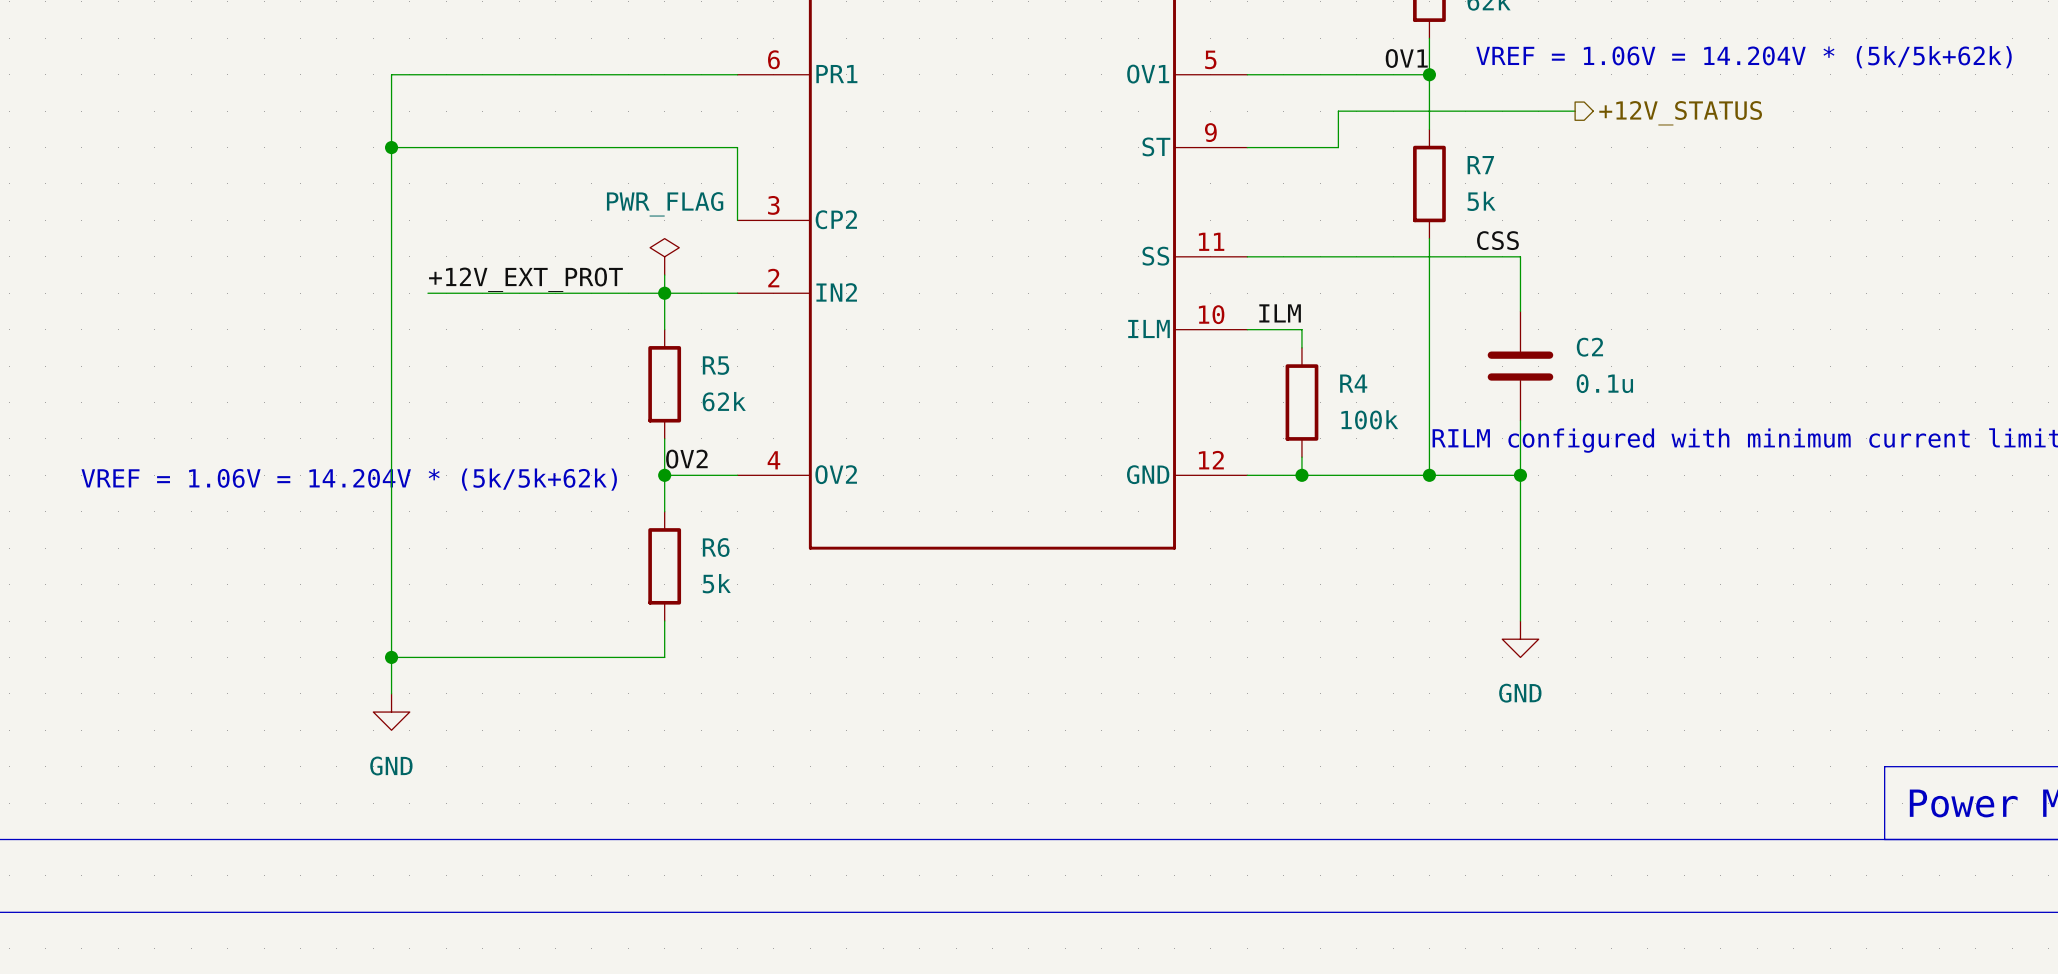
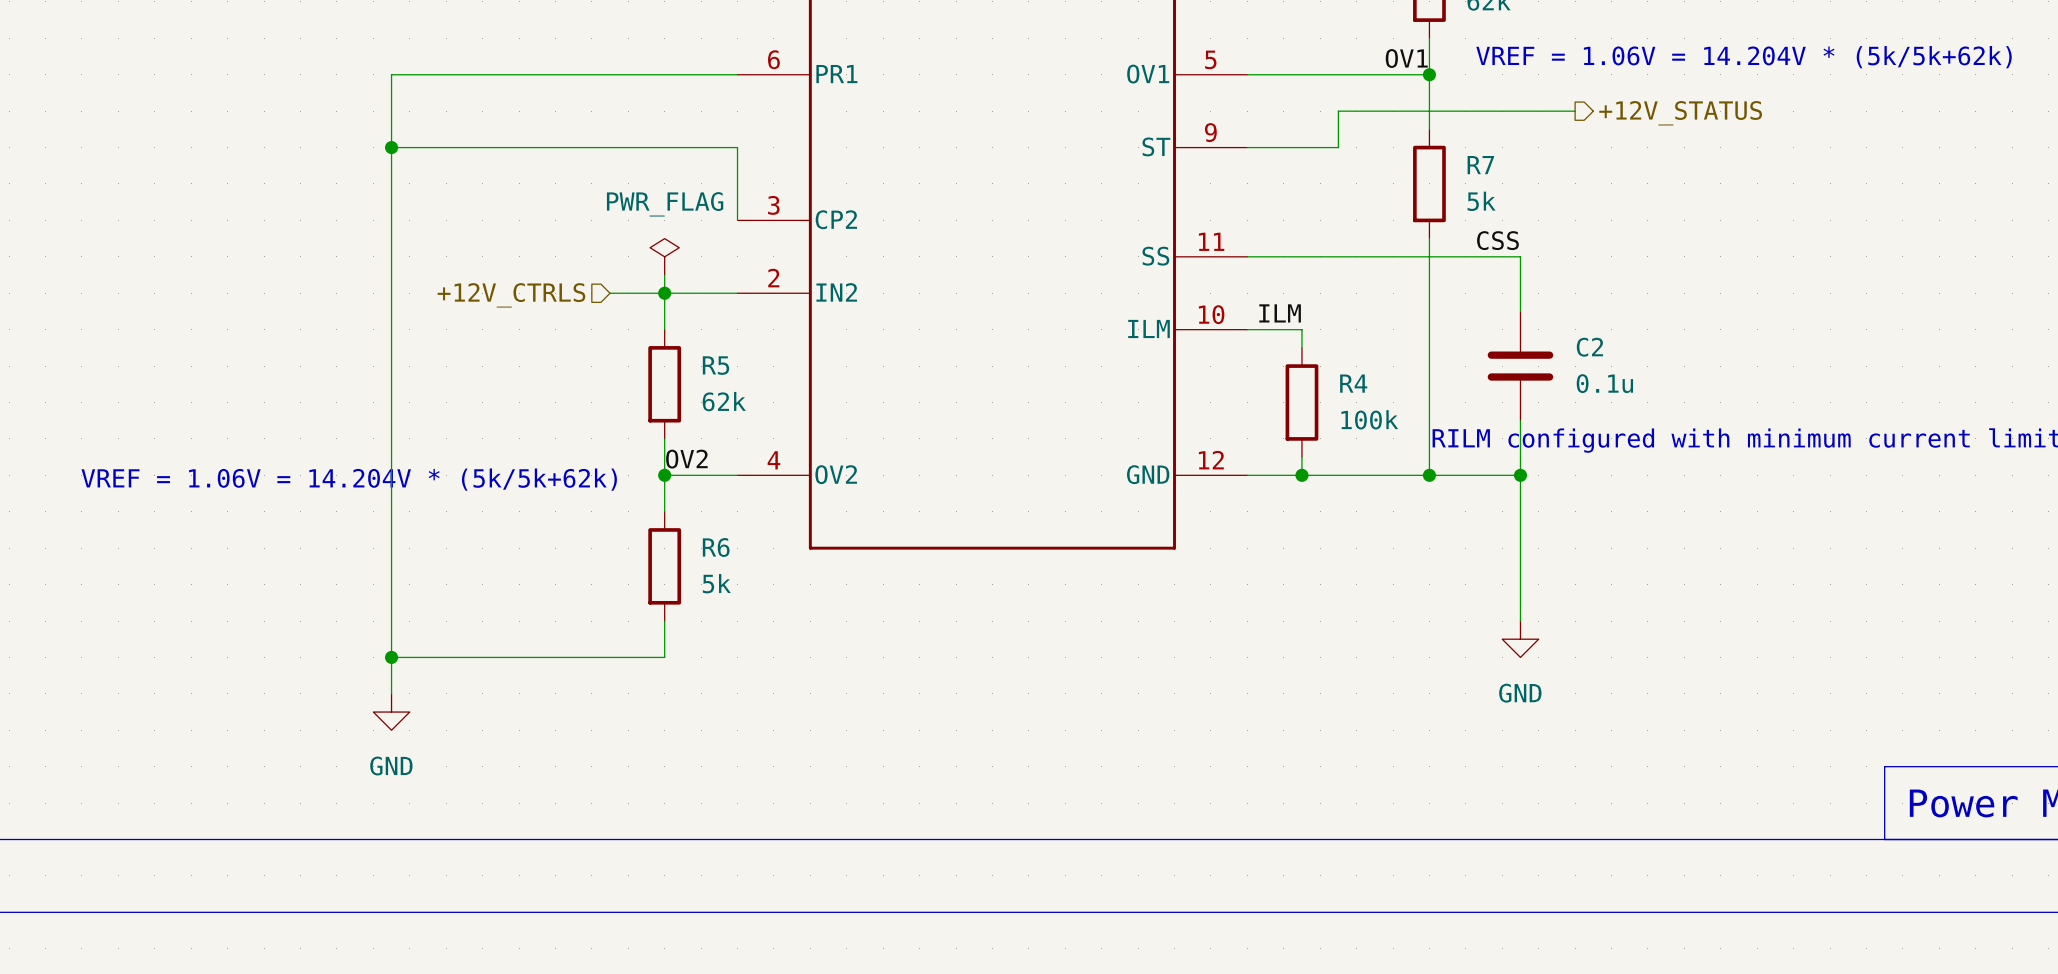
label: +12V_EXT_PROT (525, 279) -> none
wire: (427, 293) (610, 293) -> none
hierarchical label: none -> +12V_CTRLS (511, 295)

